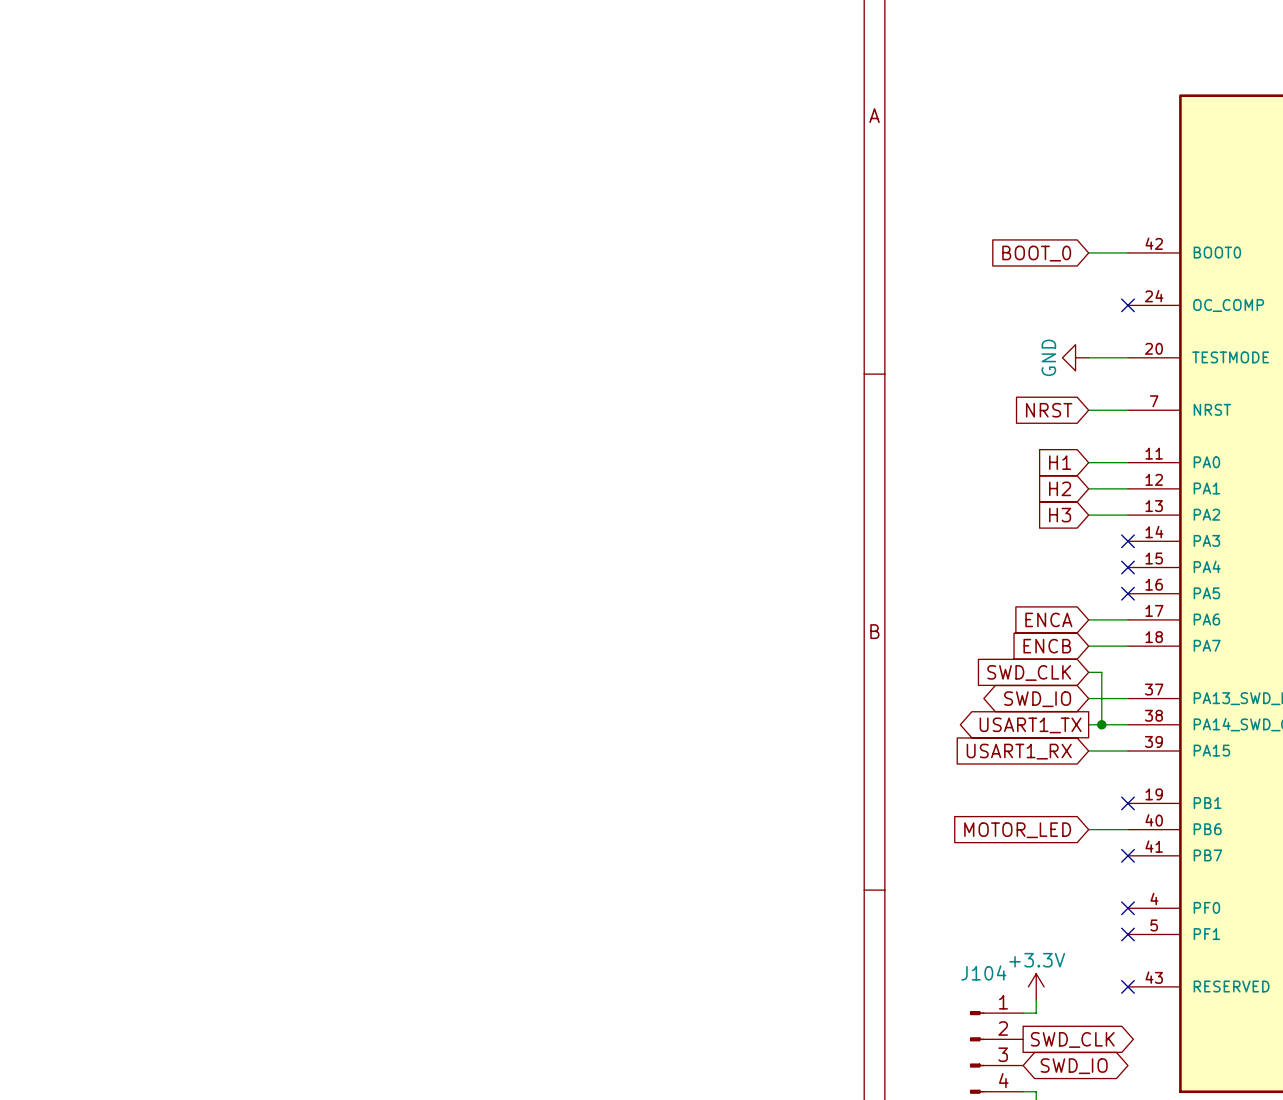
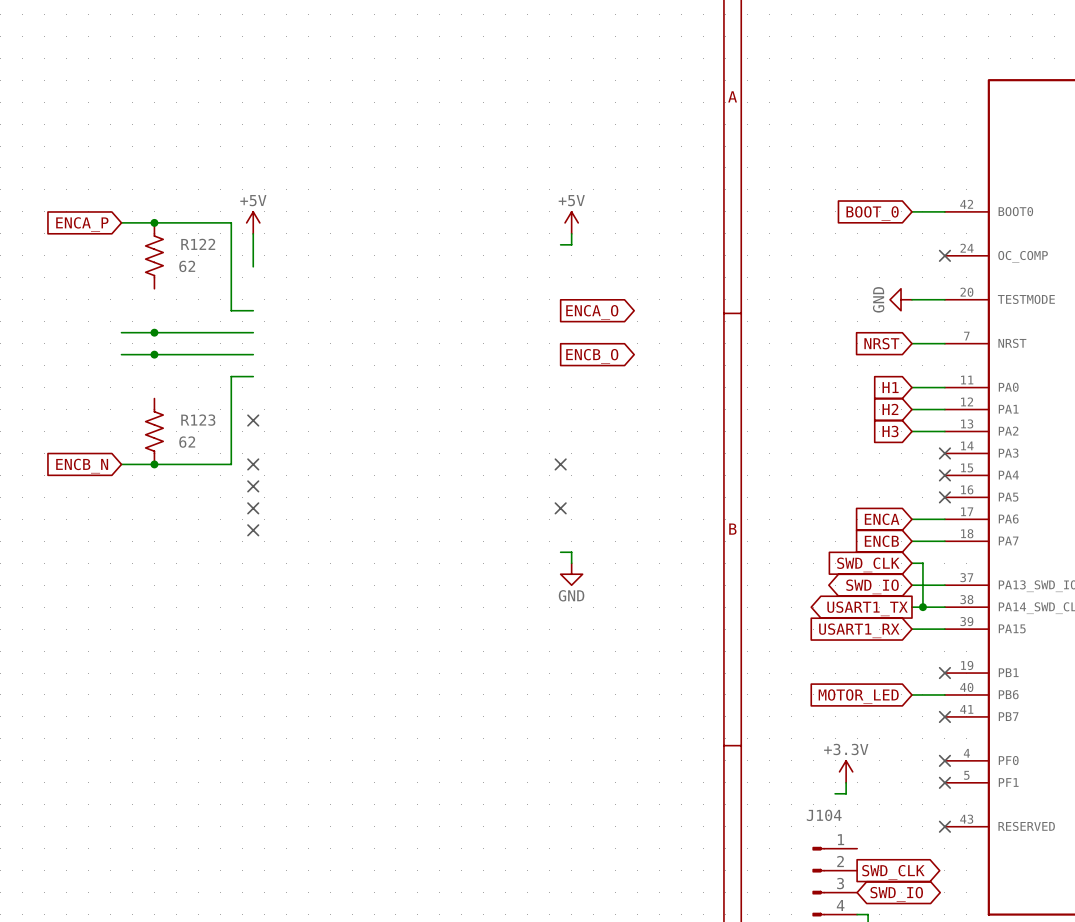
global label: none -> ENCA_P (82, 224)
wire: none -> (121, 222) (231, 222) (231, 310) (253, 310)
junction: none -> (154, 222)
power symbol: none -> +5V (253, 222)
power symbol: none -> +5V (571, 222)
wire: none -> (253, 233) (253, 266)
wire: none -> (571, 233) (571, 244) (560, 244)
R122: none -> 62 (154, 255)
global label: none -> ENCA_O (592, 312)
wire: none -> (121, 332) (253, 332)
junction: none -> (154, 332)
wire: none -> (121, 354) (253, 354)
junction: none -> (154, 354)
global label: none -> ENCB_O (592, 356)
wire: none -> (253, 376) (231, 376) (231, 464) (121, 464)
no-connect mark: none -> (253, 420)
R123: none -> 62 (154, 431)
junction: none -> (154, 464)
no-connect mark: none -> (253, 464)
no-connect mark: none -> (560, 464)
global label: none -> ENCB_N (82, 466)
no-connect mark: none -> (253, 486)
no-connect mark: none -> (253, 508)
no-connect mark: none -> (560, 508)
no-connect mark: none -> (253, 530)
wire: none -> (560, 552) (571, 552) (571, 563)
power symbol: none -> GND (571, 574)
power symbol position: +3.3V (1036, 986) -> +3.3V (846, 771)
wire: (1036, 1000) (1036, 1013) (1023, 1013) -> (846, 782) (846, 793) (835, 793)

